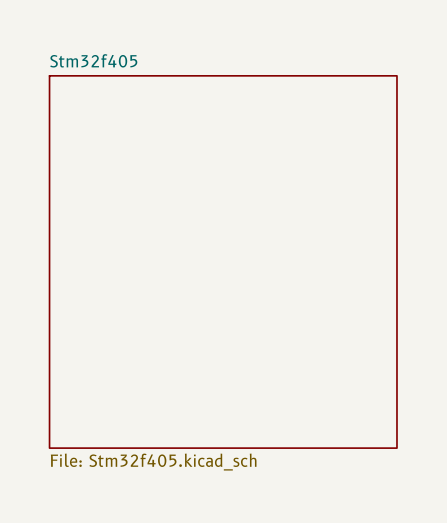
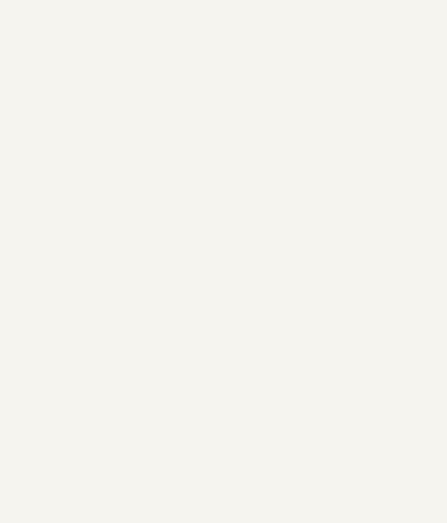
sheet Stm32f405: File: Stm32f405.kicad_sch (223, 261) -> none

